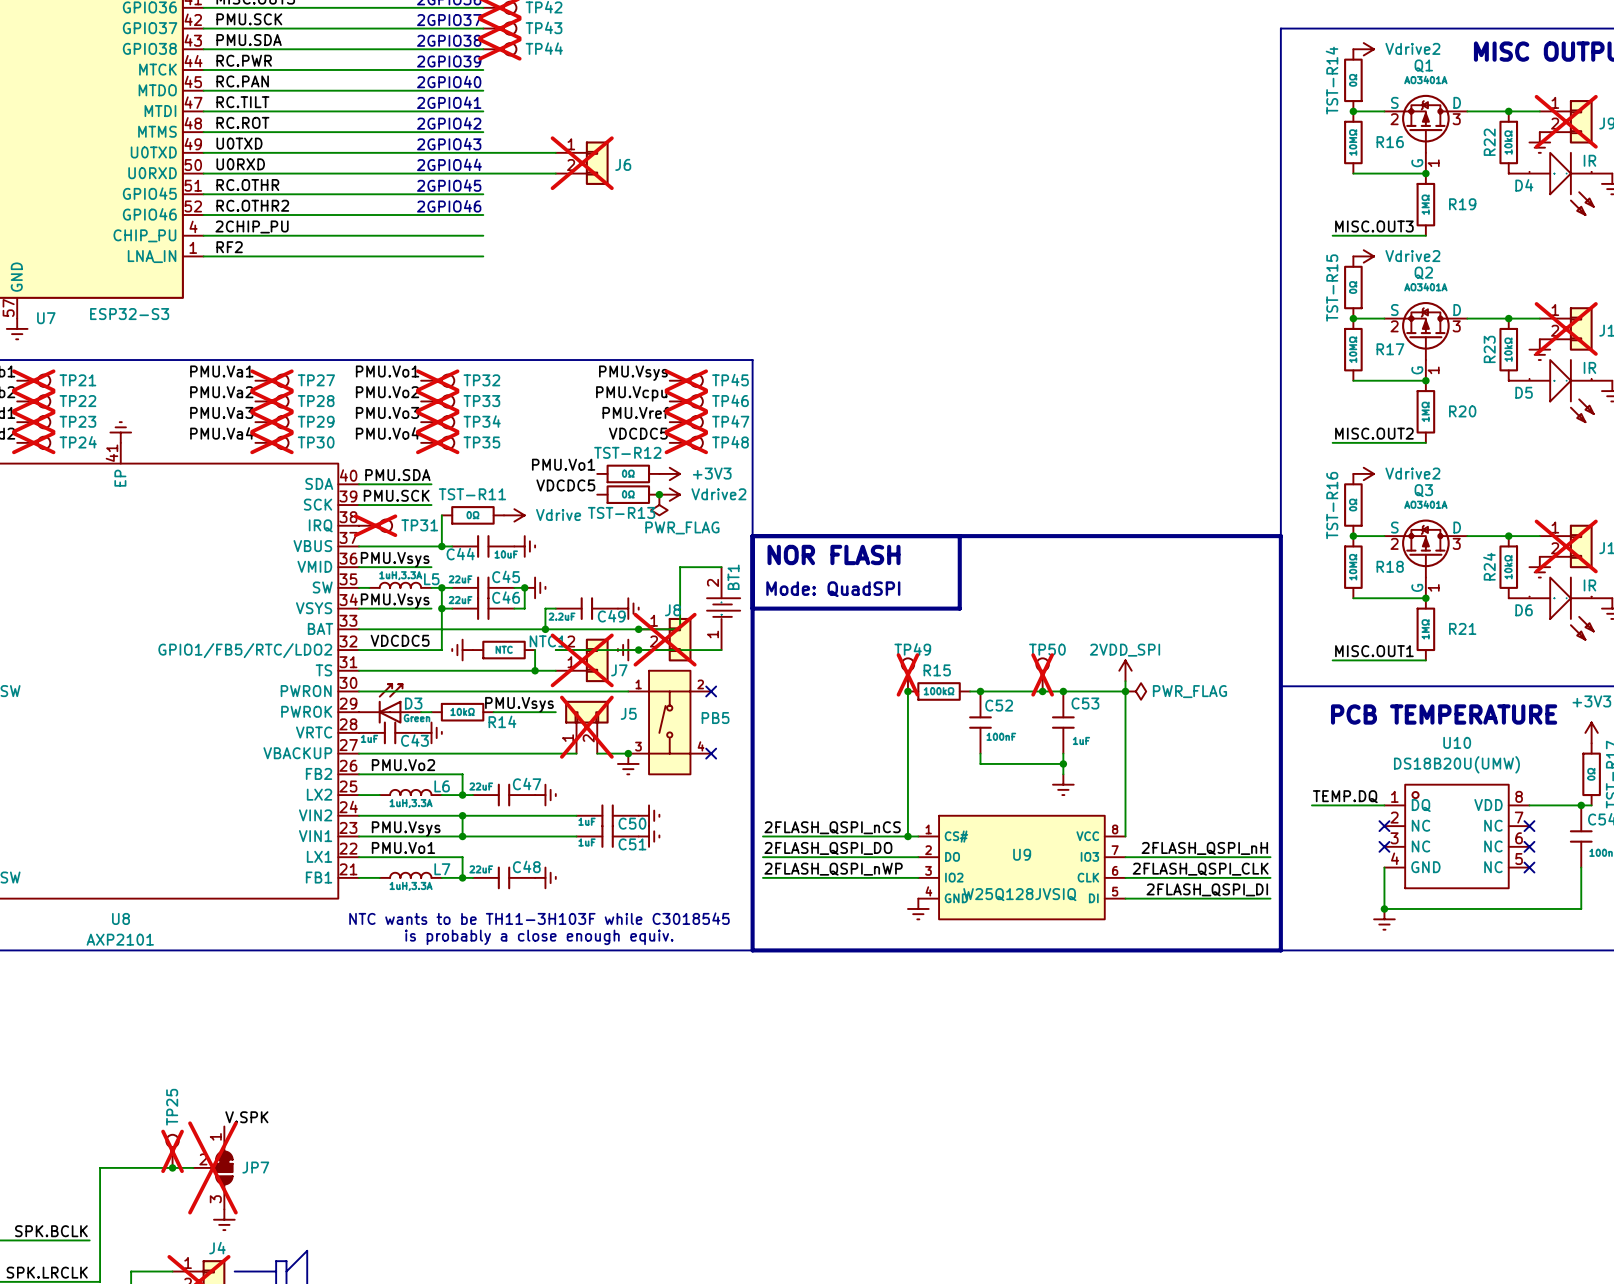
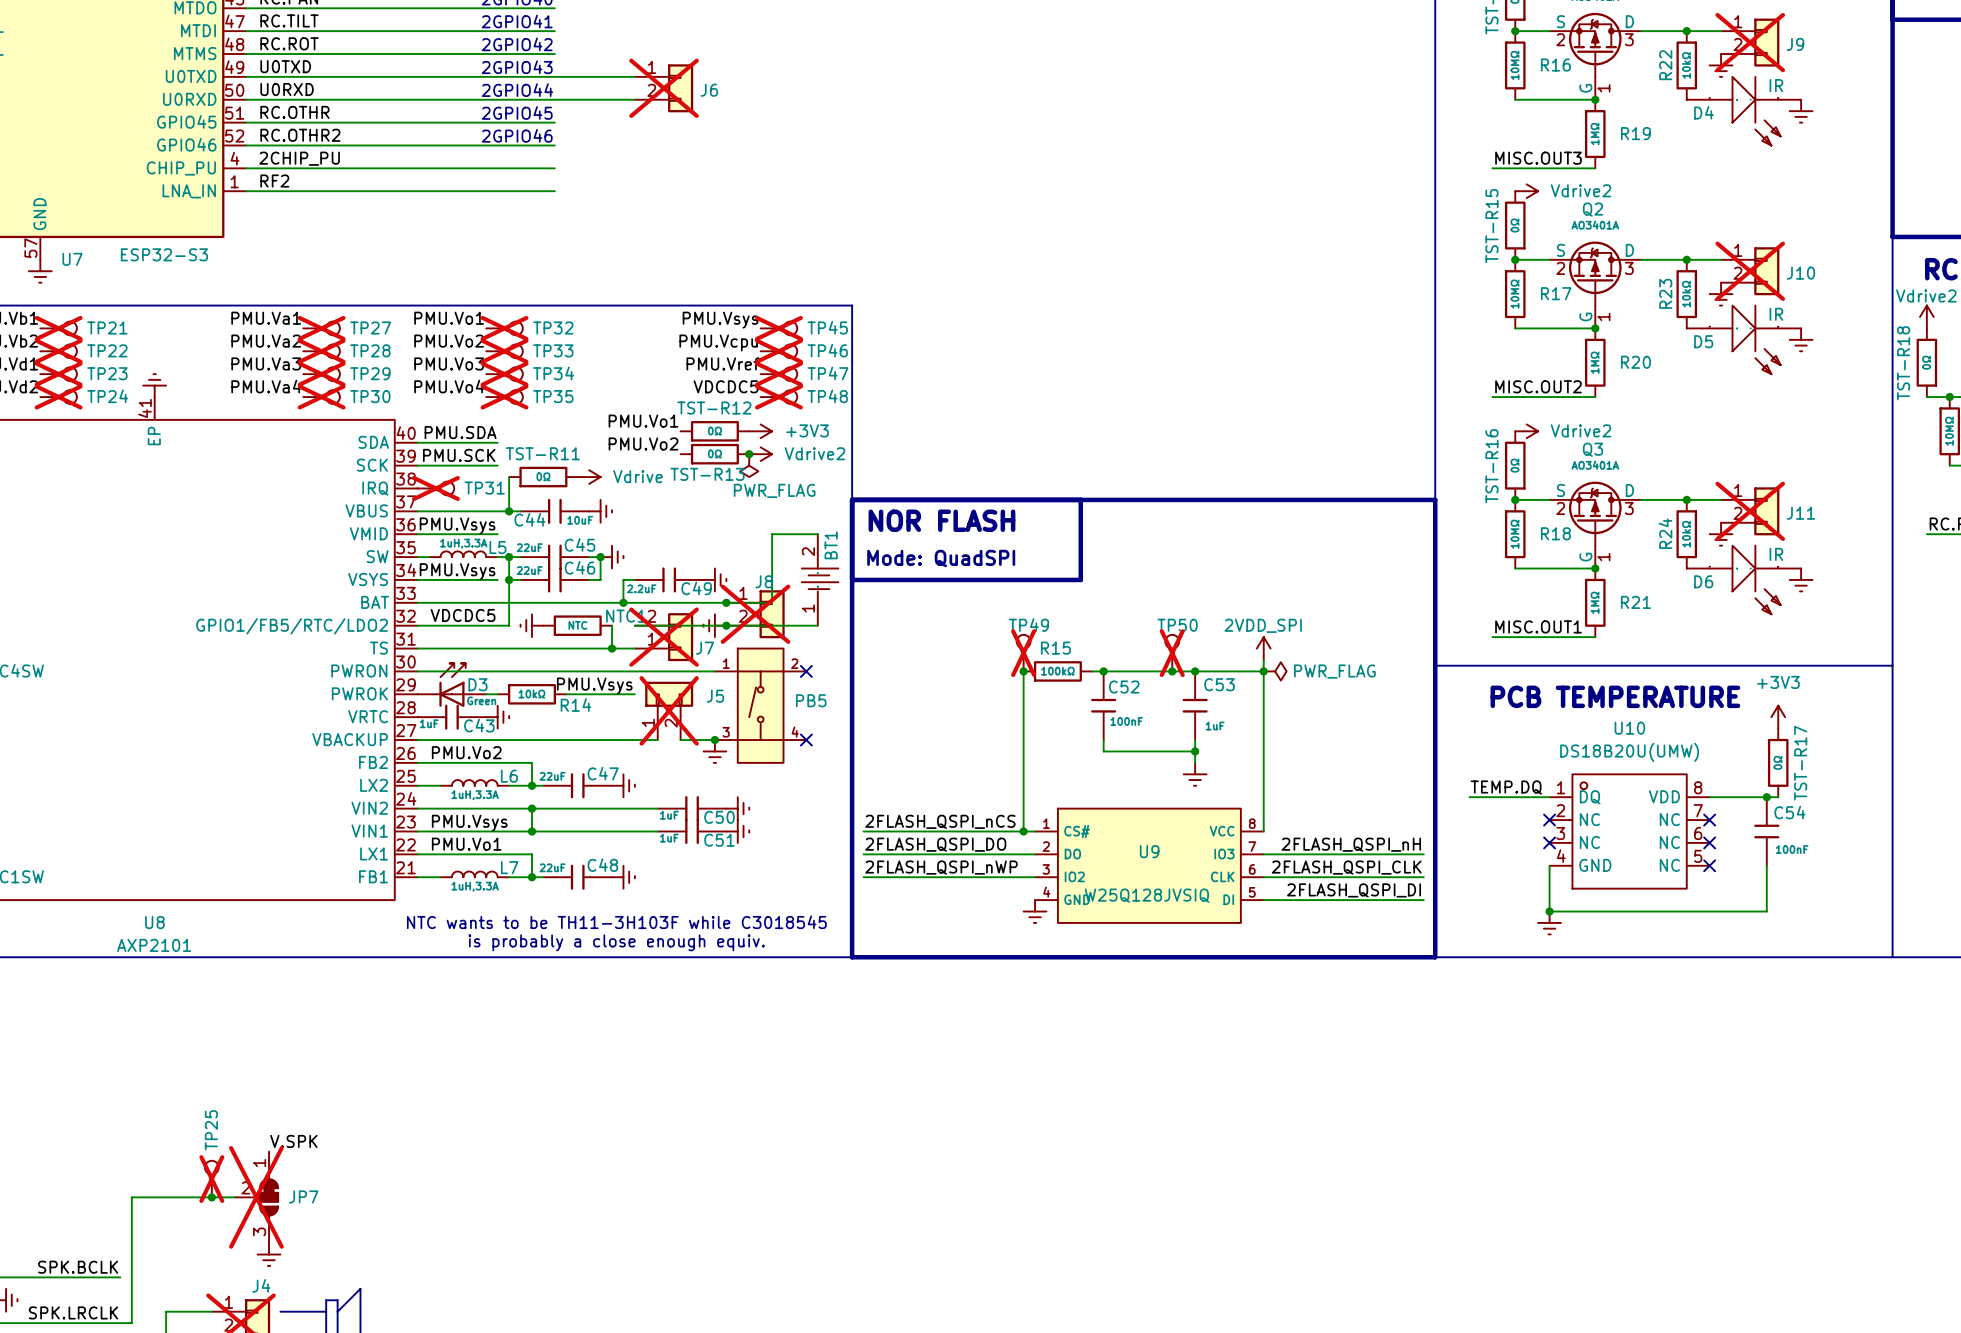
label: VDCDC5 (565, 485) -> PMU.Vo2 (643, 443)

